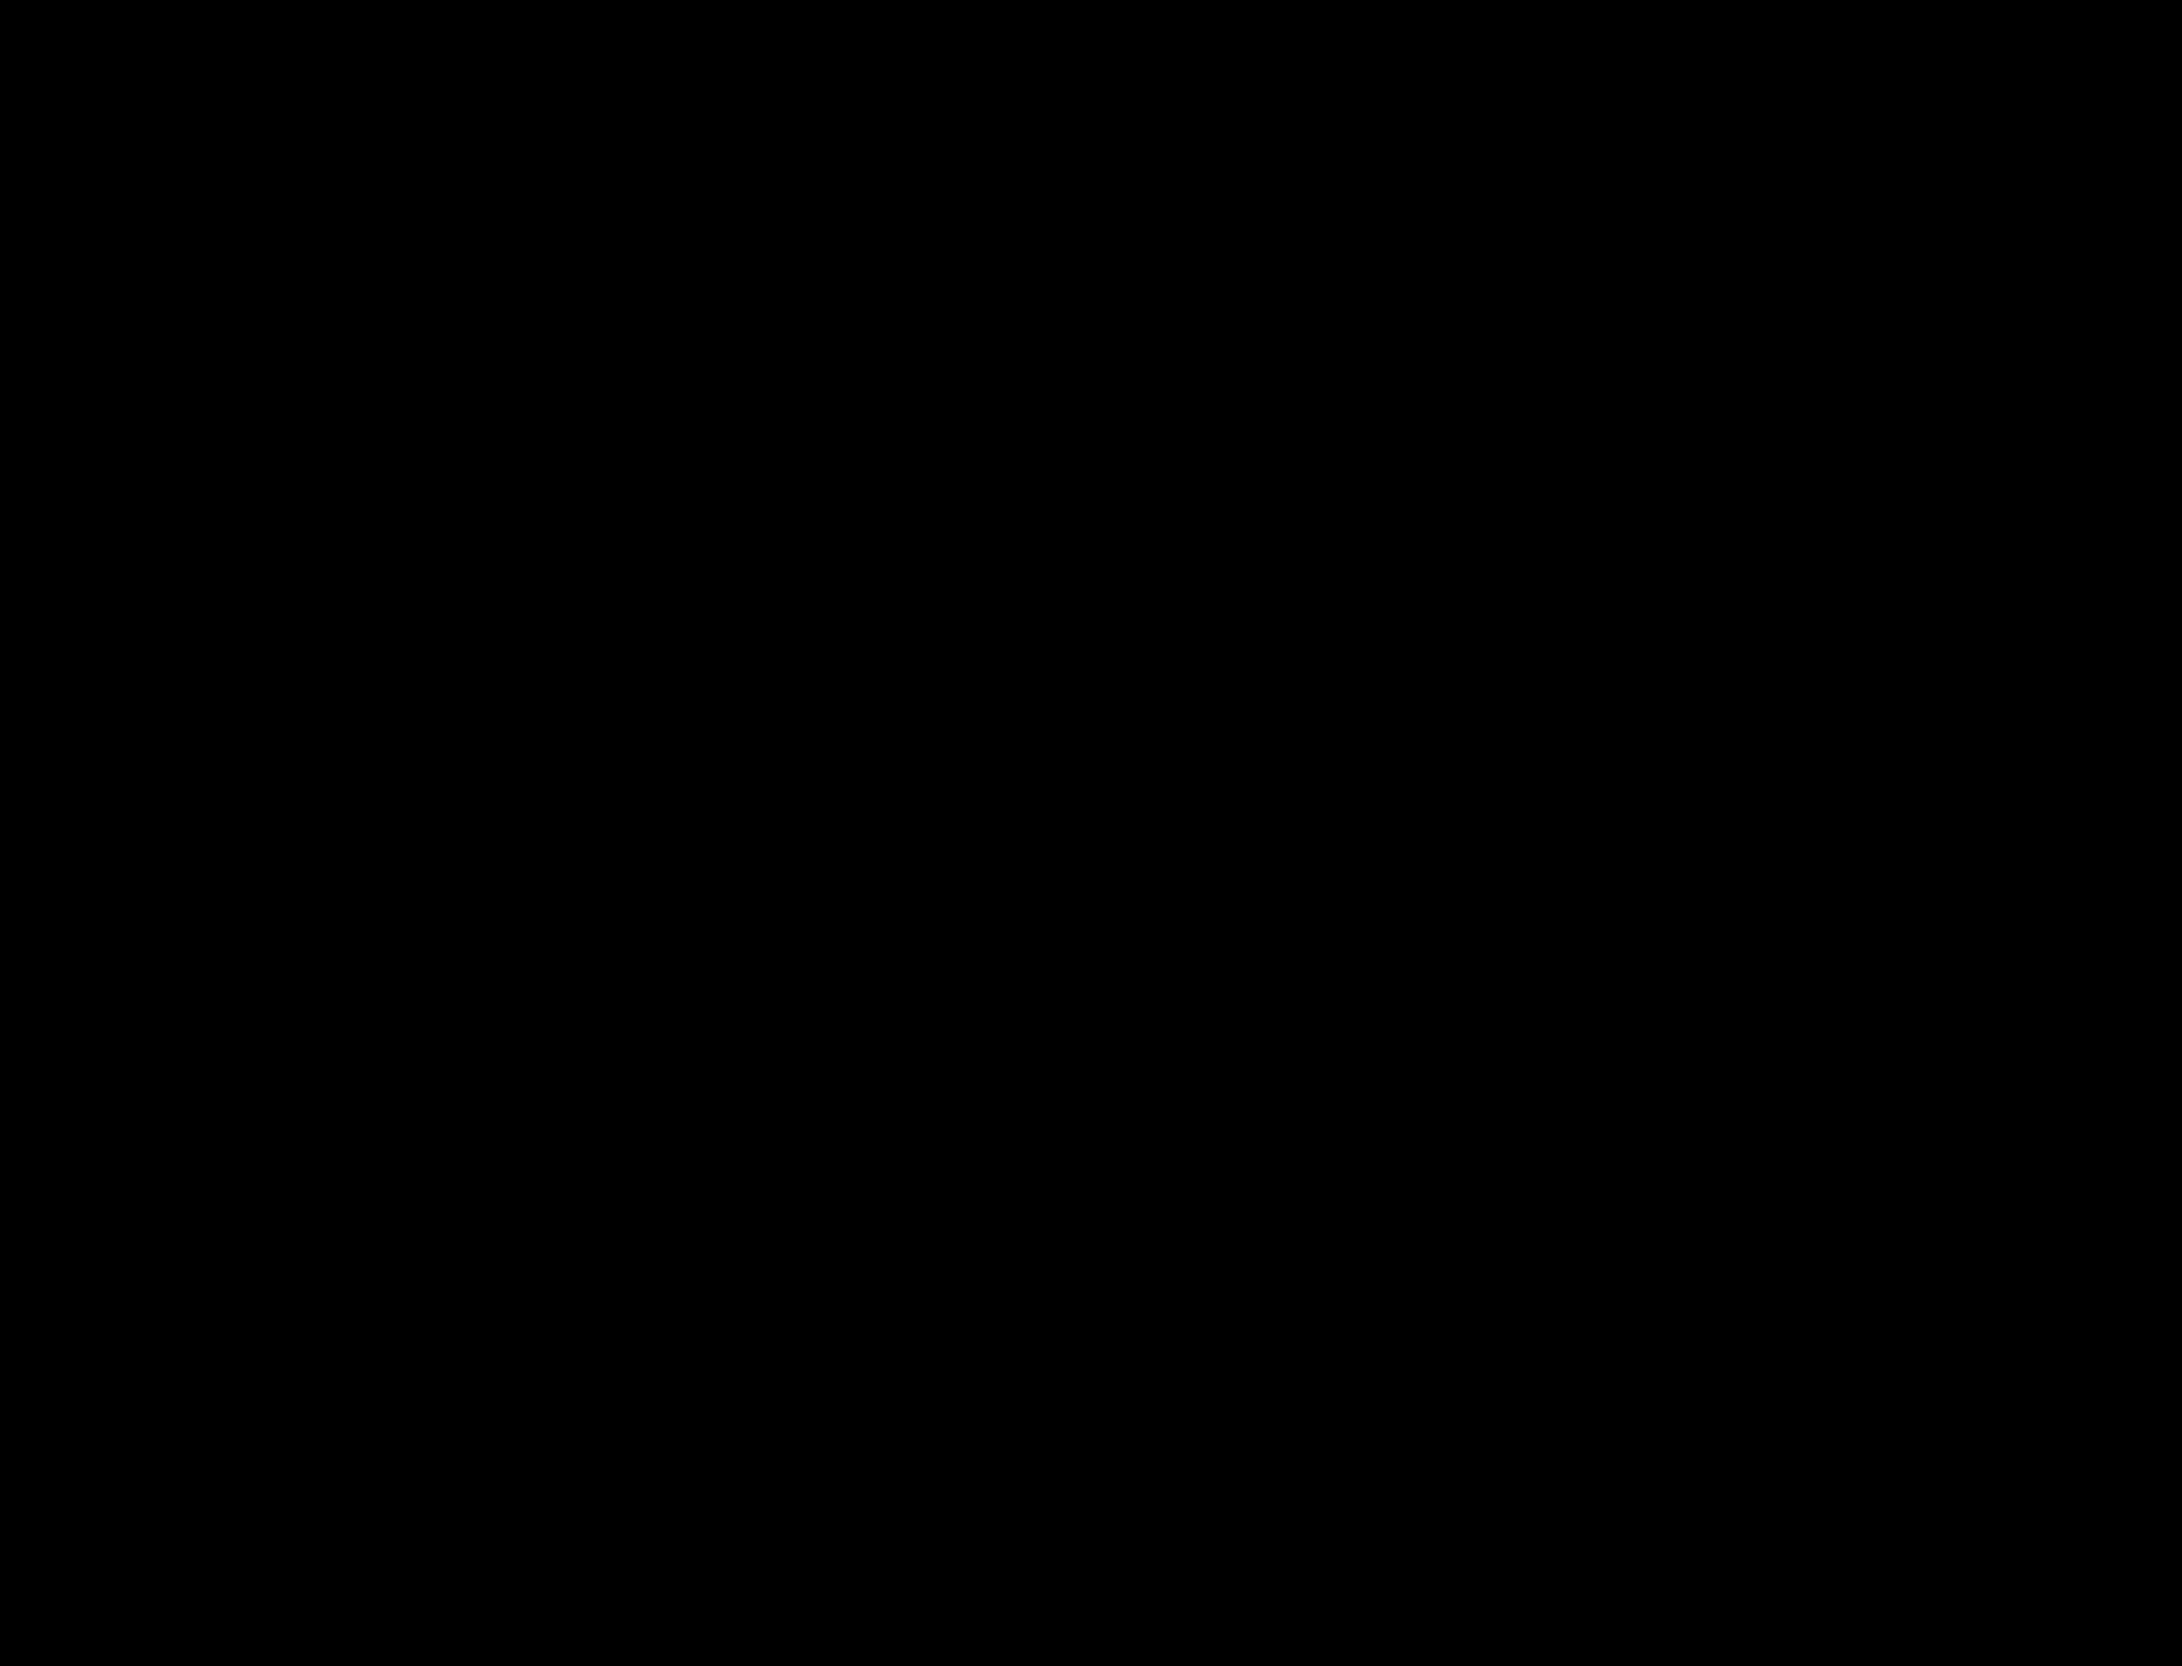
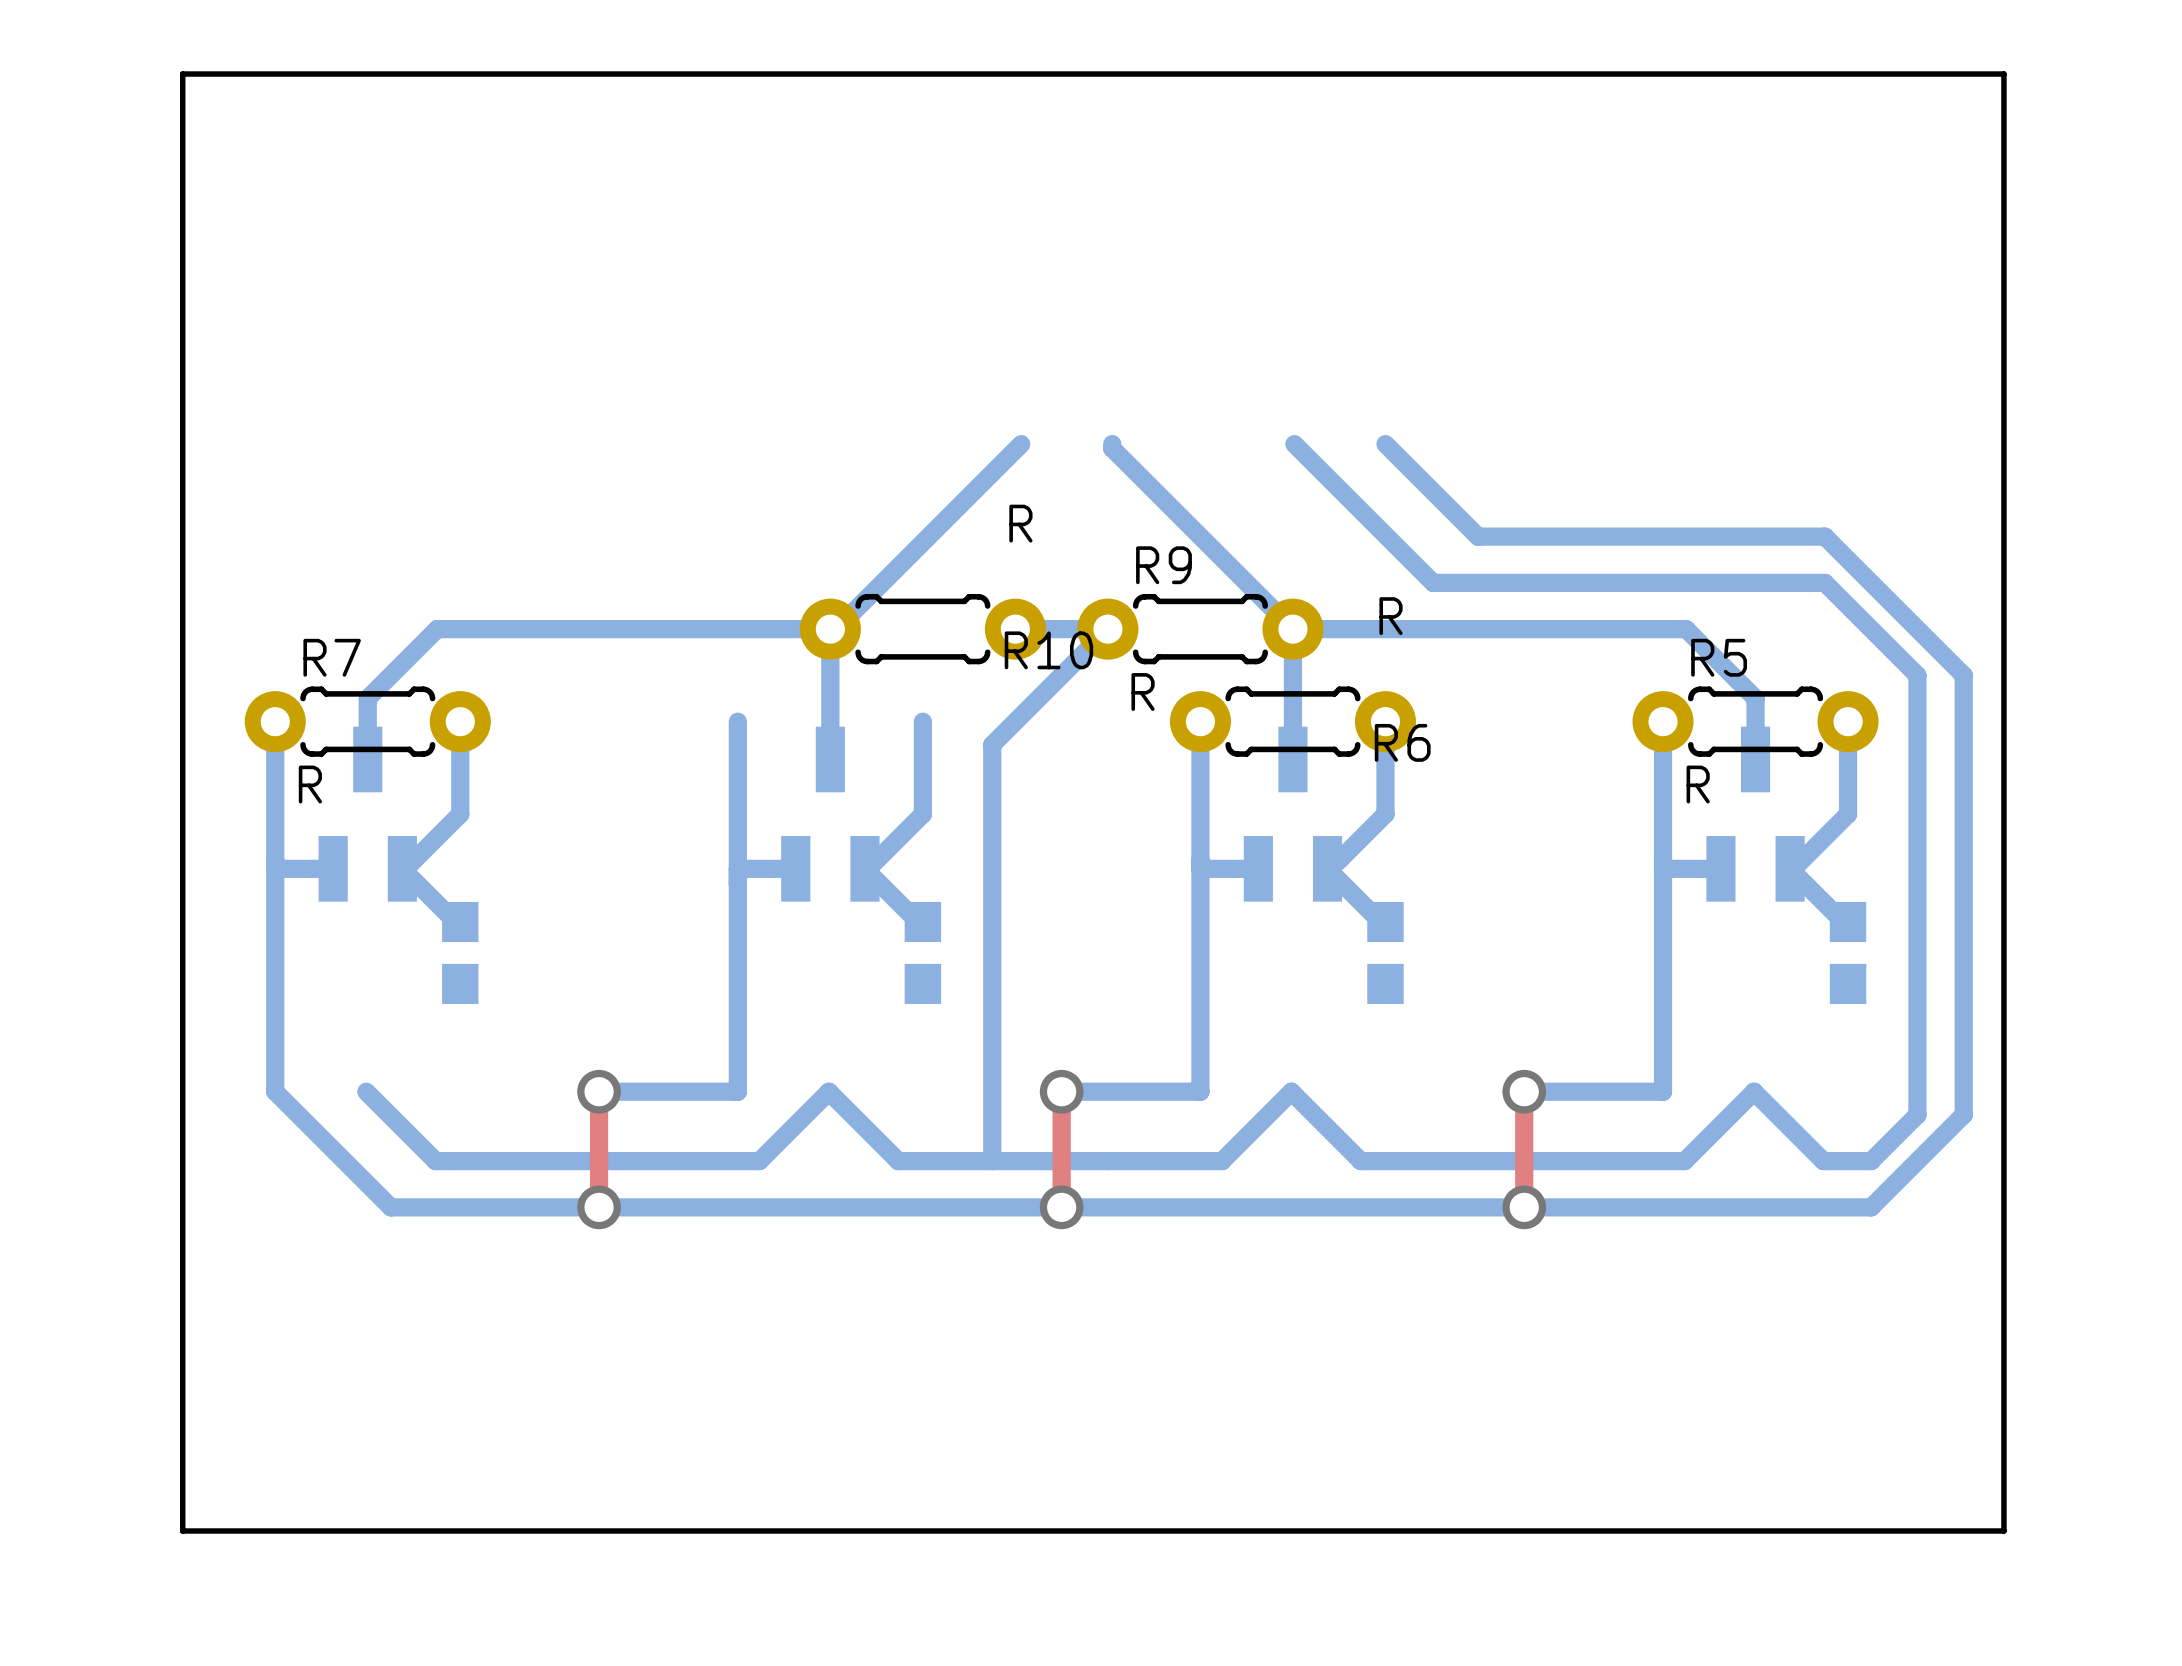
board edge: none -> (182, 74) (2003, 74) (2003, 1531) (182, 1531) (182, 74)
bottom track: none -> (1021, 444) (836, 629) (437, 629) (367, 698) (367, 759)
bottom track: none -> (1112, 444) (1112, 448) (1292, 629)
bottom track: none -> (1294, 444) (1433, 582) (1824, 582) (1917, 675) (1917, 1114) (1871, 1161) (1823, 1161) (1754, 1091) (1684, 1161) (1360, 1161) (1291, 1091) (1222, 1161) (898, 1161) (828, 1091) (759, 1161) (435, 1161) (366, 1091)
bottom track: none -> (1385, 444) (1477, 536) (1824, 536) (1963, 675) (1963, 1114) (1871, 1207) (390, 1207) (275, 1091) (275, 721)
bottom track: none -> (830, 629) (830, 759)
R10: none -> R (922, 629)
bottom track: none -> (1015, 629) (1107, 629) (992, 744) (992, 1161)
R9: none -> R (1200, 629)
bottom track: none -> (1292, 629) (1686, 629) (1755, 698) (1755, 759)
bottom track: none -> (1292, 629) (1292, 759)
R7: none -> R (367, 721)
bottom track: none -> (460, 721) (460, 814) (405, 868) (402, 868) (455, 921) (460, 921)
bottom track: none -> (737, 721) (737, 1091) (599, 1091)
bottom track: none -> (922, 721) (922, 814) (868, 868) (864, 868) (918, 921) (922, 921)
bottom track: none -> (1200, 721) (1200, 1091) (1061, 1091)
R6: none -> R (1292, 721)
bottom track: none -> (1385, 721) (1385, 814) (1339, 860) (1327, 868) (1380, 921) (1385, 921)
bottom track: none -> (1663, 721) (1663, 1091) (1524, 1091)
R5: none -> R (1755, 721)
bottom track: none -> (1848, 721) (1848, 814) (1793, 868) (1790, 868) (1843, 921) (1848, 921)
part: none -> (367, 814)
part: none -> (830, 814)
part: none -> (1292, 814)
part: none -> (1755, 814)
bottom track: none -> (275, 868) (333, 868)
bottom track: none -> (737, 868) (795, 868)
bottom track: none -> (1200, 868) (1258, 868)
bottom track: none -> (1663, 868) (1720, 868)
part: none -> (460, 952)
part: none -> (922, 952)
part: none -> (1385, 952)
part: none -> (1848, 952)
top track: none -> (599, 1091) (599, 1207)
via: none -> (599, 1091)
top track: none -> (1061, 1091) (1061, 1207)
via: none -> (1061, 1091)
top track: none -> (1524, 1091) (1524, 1207)
via: none -> (1524, 1091)
via: none -> (599, 1207)
via: none -> (1061, 1207)
via: none -> (1524, 1207)

